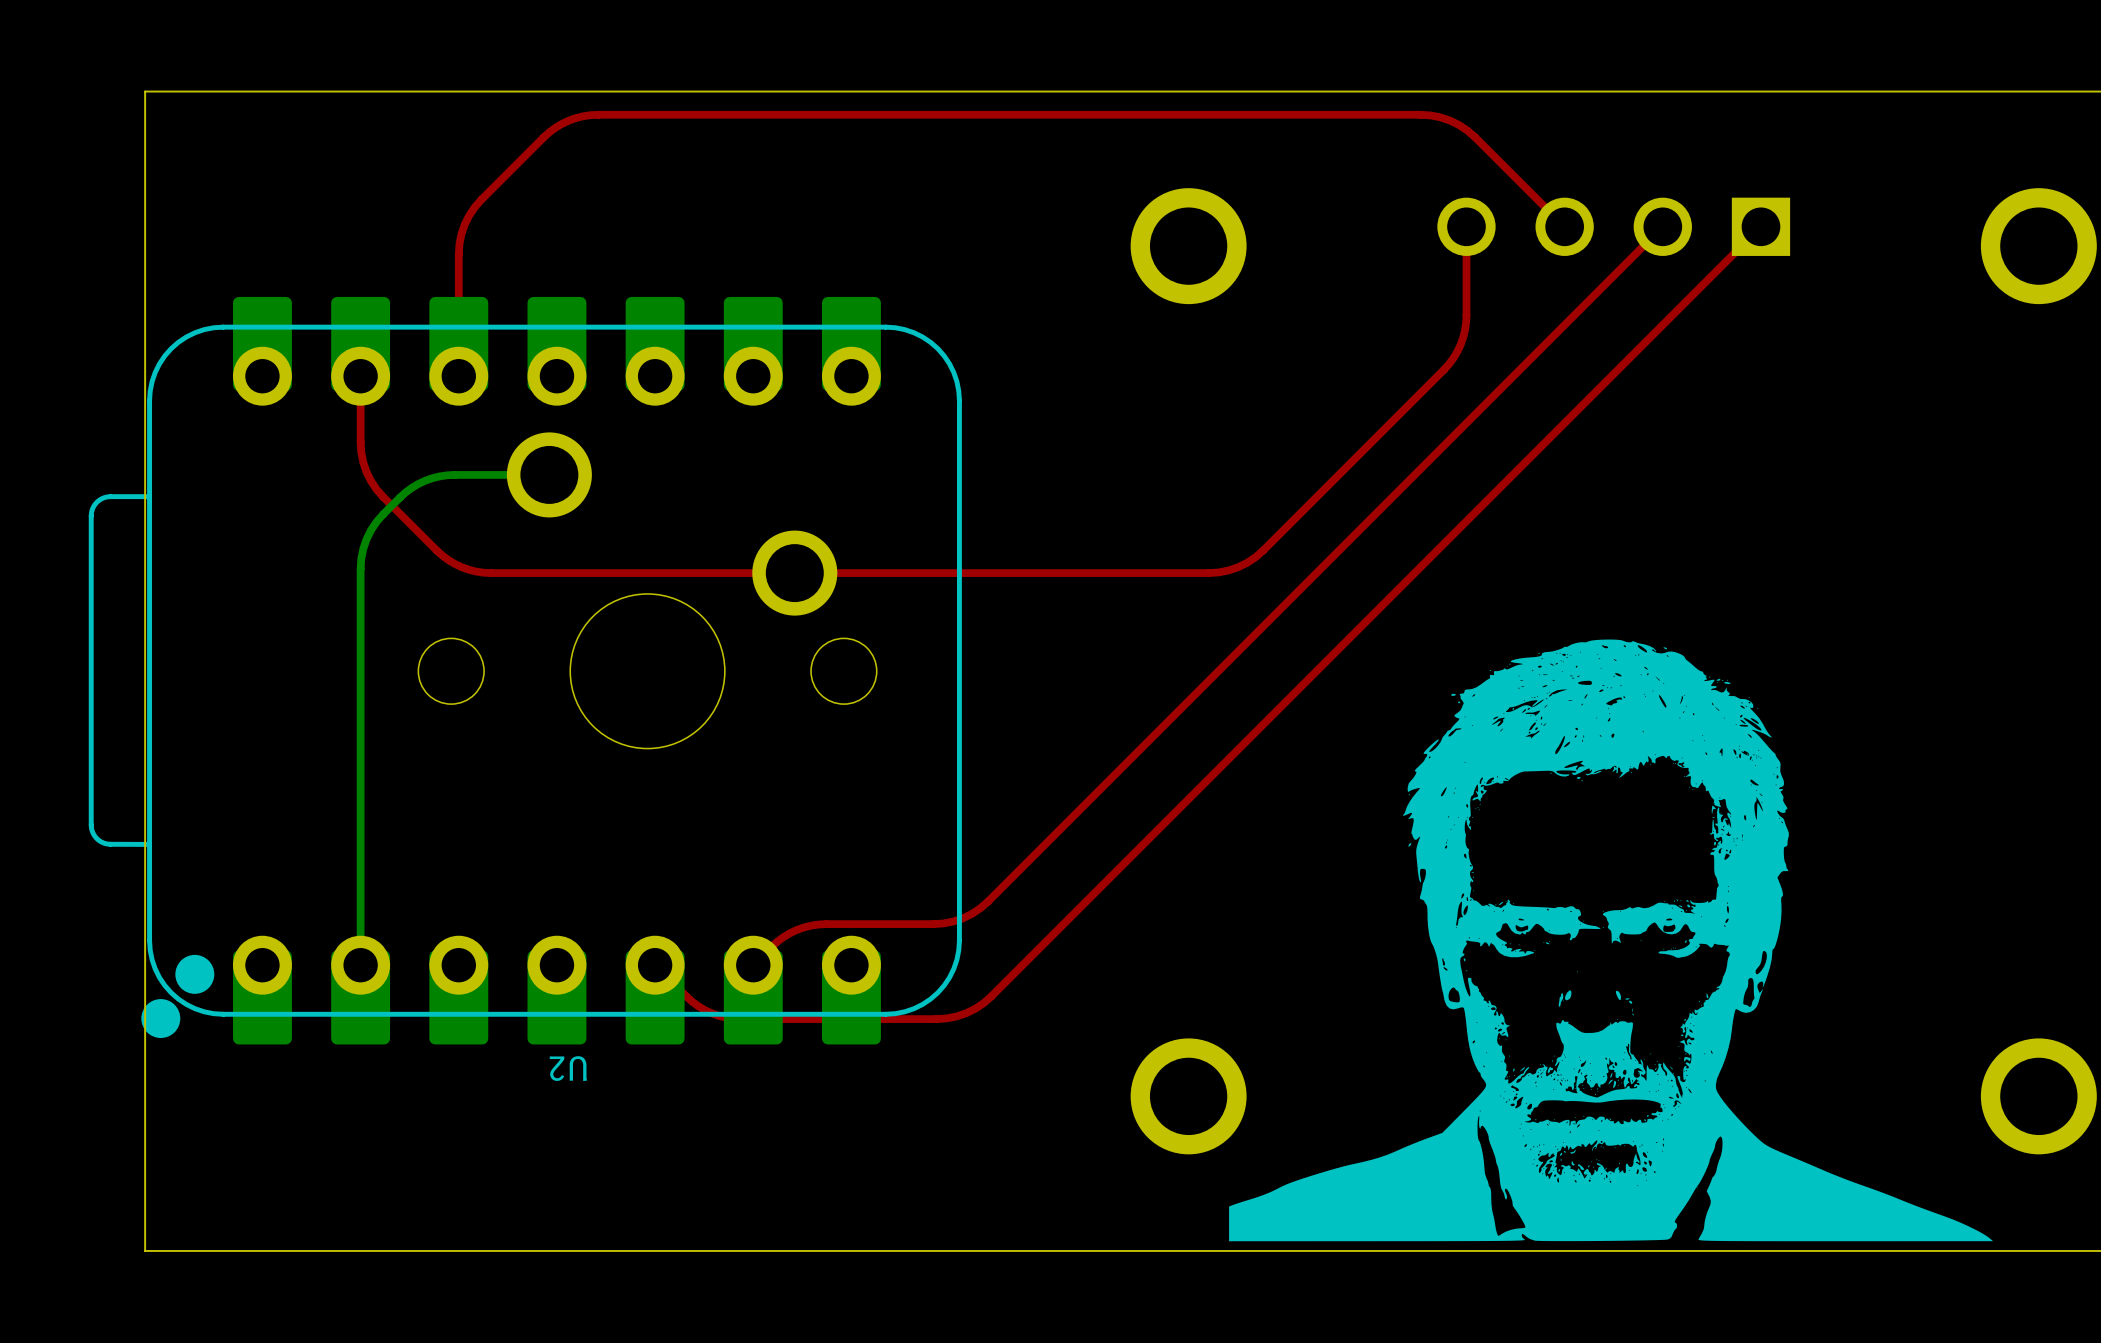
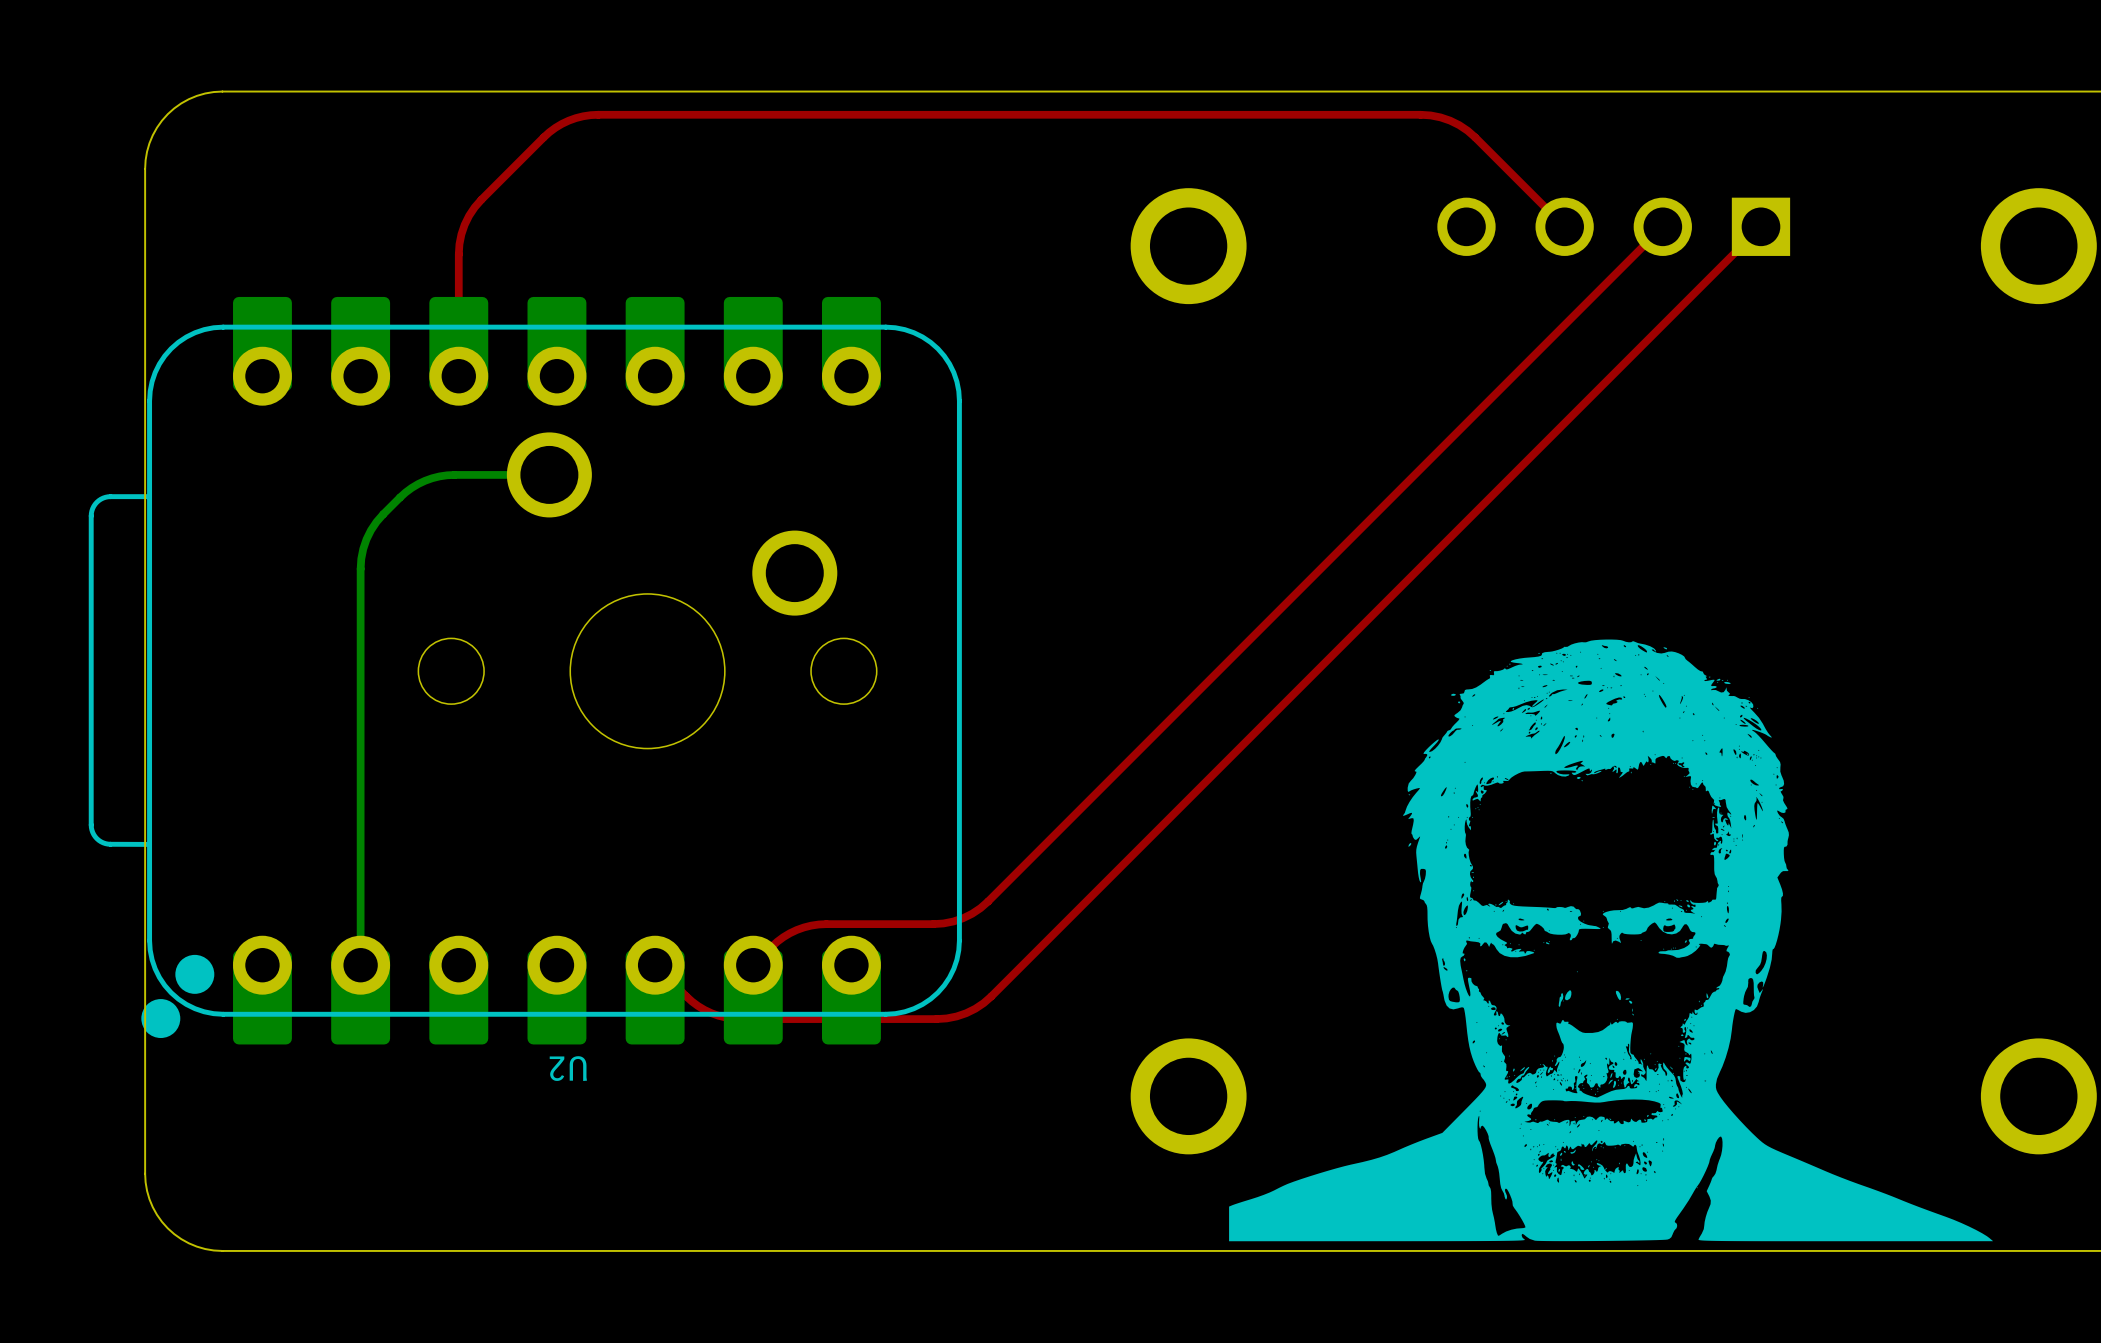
board edge: (222, 91) (145, 91) (145, 168) -> (222, 91) (196, 95) (181, 103) (167, 114) (156, 127) (149, 143) (145, 168)
top track: (1466, 226) (1466, 322) (1463, 337) (1453, 358) (1263, 550) (1247, 562) (1218, 572) (476, 571) (454, 563) (442, 555) (383, 497) (370, 481) (361, 452) (360, 376) -> none
board edge: (145, 1173) (145, 1250) (222, 1250) -> (145, 1173) (149, 1199) (156, 1214) (167, 1228) (188, 1243) (205, 1249) (222, 1250)

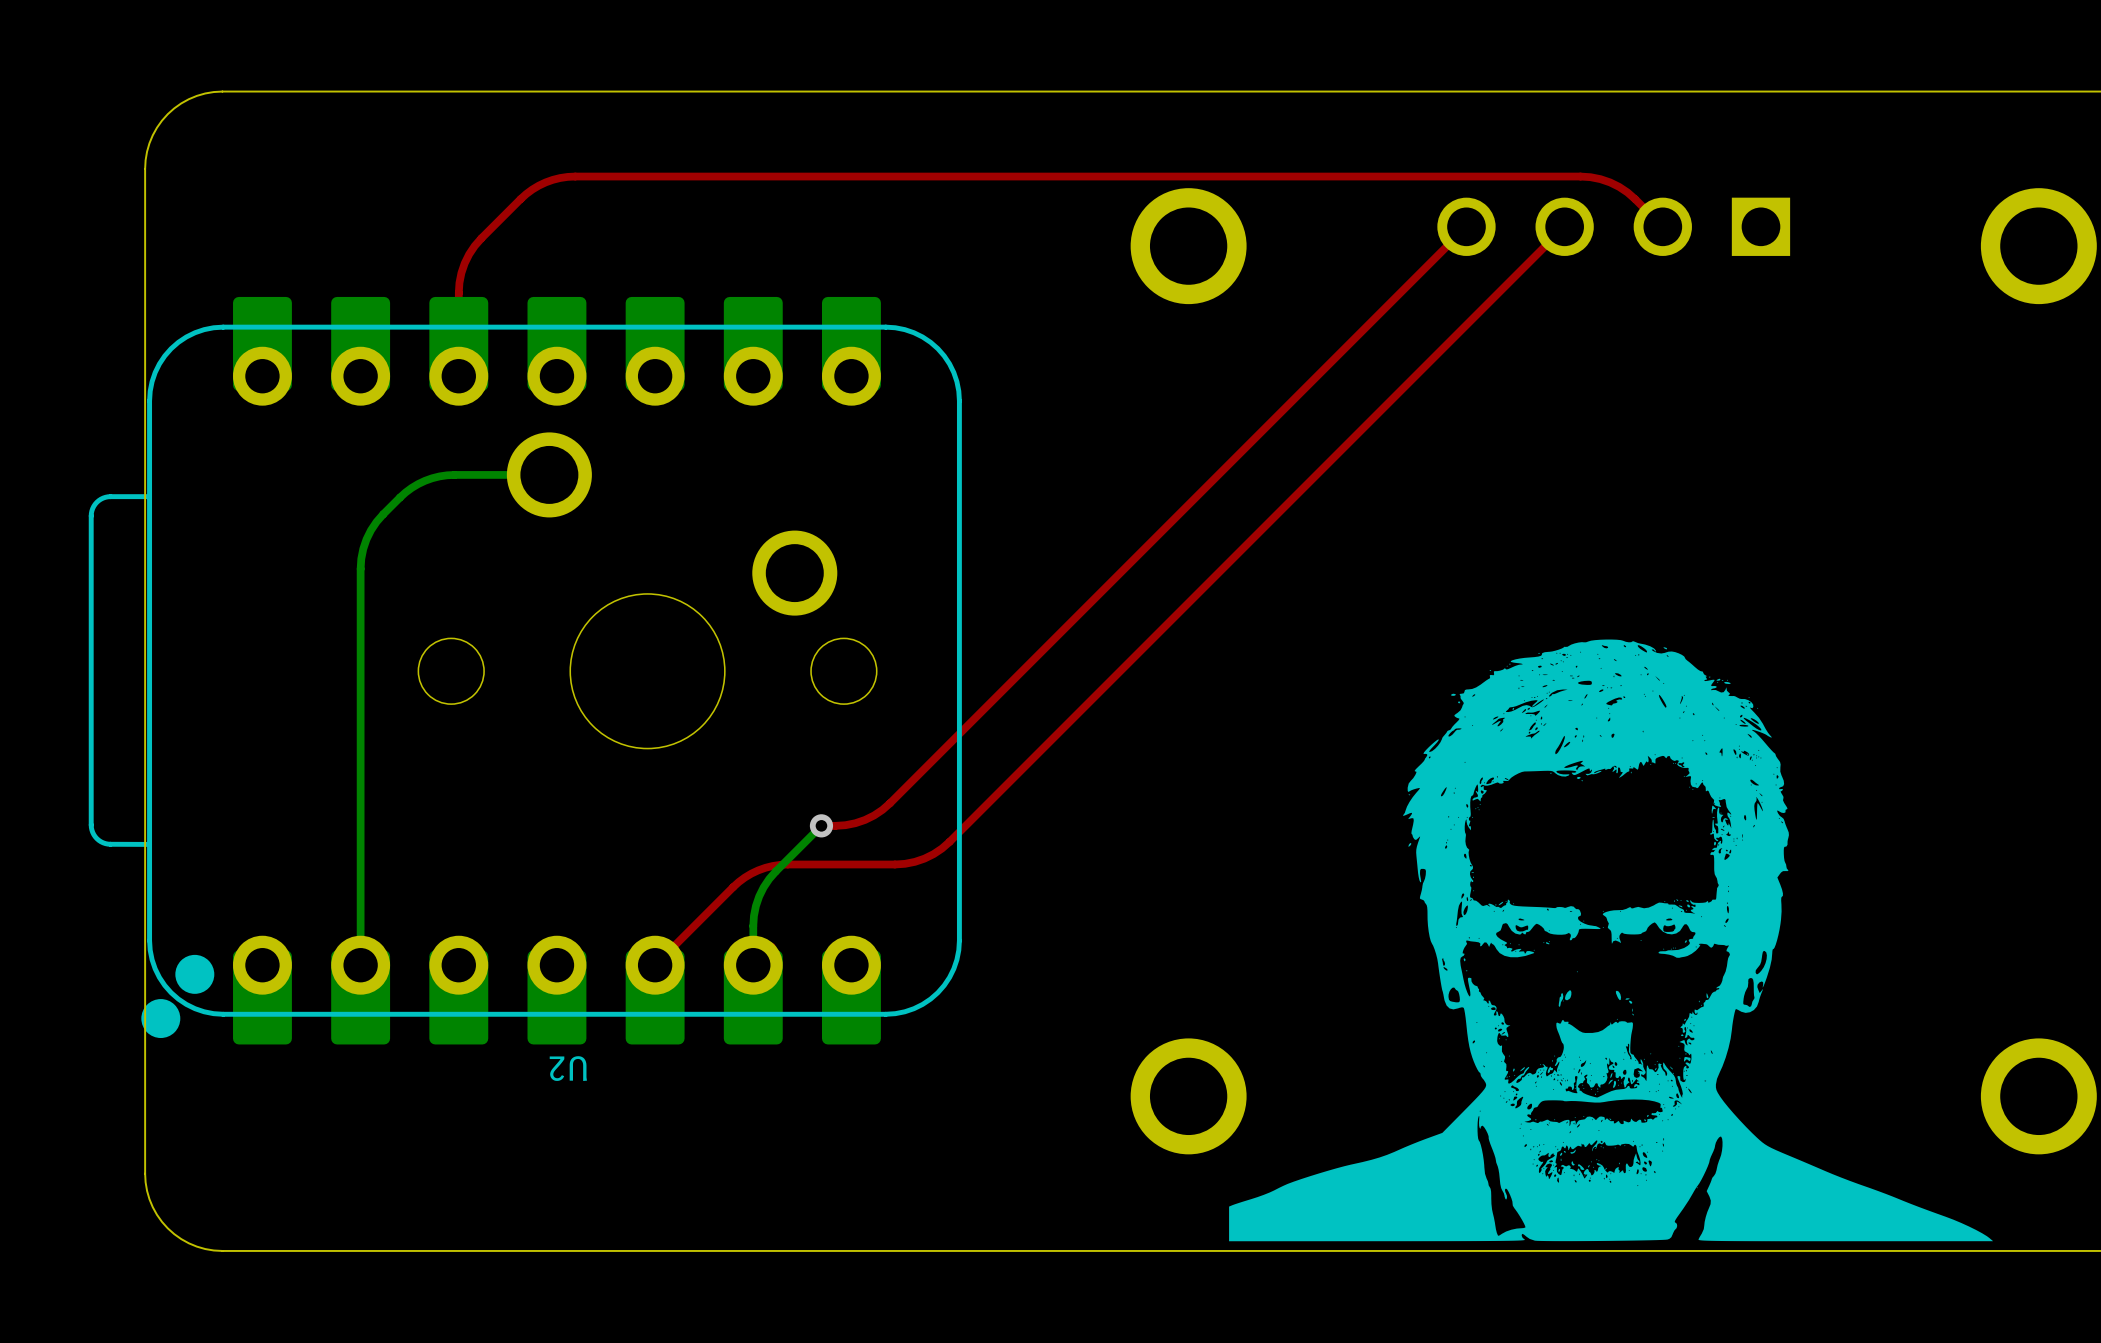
top track: none -> (1466, 226) (890, 803) (874, 815) (855, 823) (821, 825)
top track: (1564, 226) (1467, 130) (1450, 120) (1430, 115) (590, 115) (568, 120) (549, 132) (474, 207) (464, 224) (459, 244) (458, 292) -> (1662, 226) (1635, 199) (1619, 186) (1600, 179) (1580, 176) (567, 176) (545, 182) (532, 189) (481, 238) (464, 263) (458, 292)
top track: none -> (1564, 226) (942, 848) (924, 858) (905, 863) (787, 864) (758, 870) (733, 887) (655, 965)
top track: (1662, 226) (980, 908) (963, 918) (943, 923) (811, 925) (789, 933) (771, 946) -> none
top track: (1760, 226) (983, 1003) (956, 1016) (936, 1019) (733, 1018) (711, 1013) (698, 1006) (668, 978) -> none
bottom track: none -> (821, 825) (775, 871) (759, 896) (753, 915) (753, 965)
via: none -> (821, 825)

